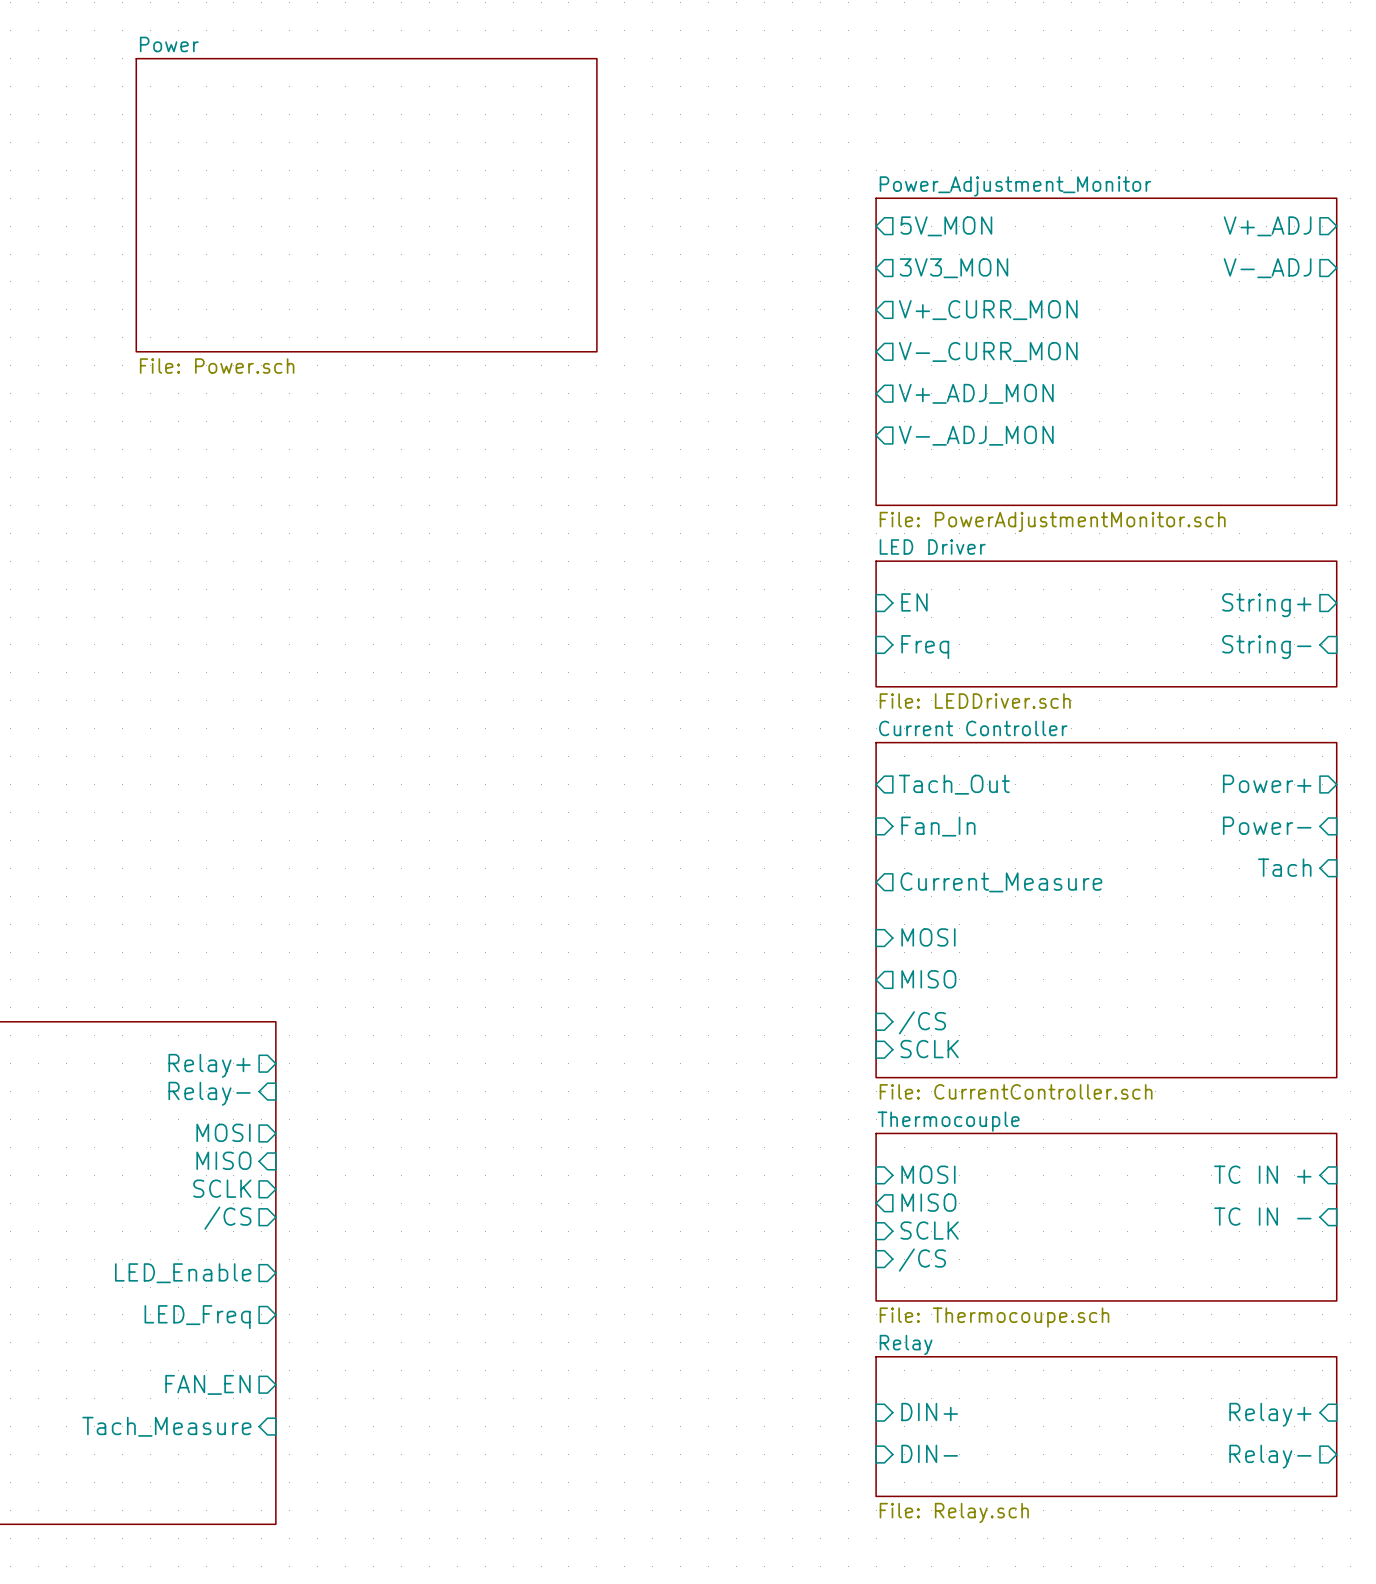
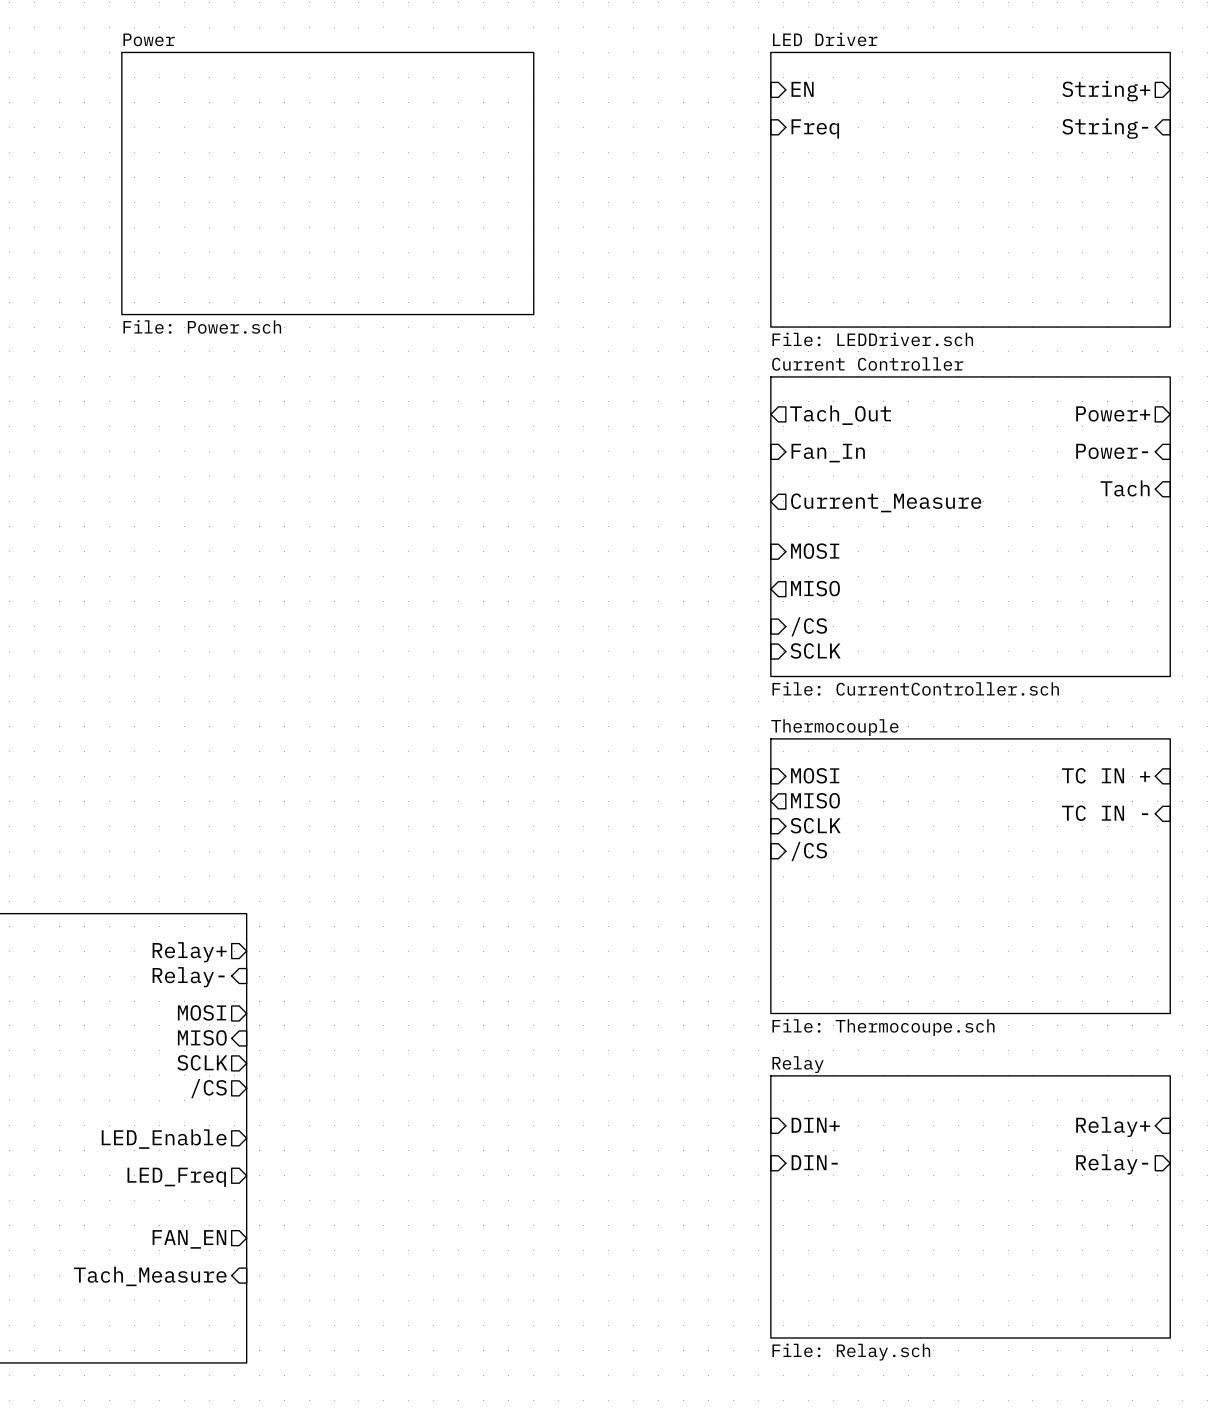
sheet pin: none -> EN (802, 89)
sheet pin: none -> String+ (1106, 91)
sheet pin: none -> Freq (815, 128)
sheet pin: none -> String- (1105, 128)
sheet LED Driver: none -> File: LEDDriver.sch (970, 189)
sheet pin: 5V_MON (946, 226) -> none
sheet pin: V+_ADJ (1267, 226) -> none
sheet pin: 3V3_MON (953, 268) -> none
sheet pin: V-_ADJ (1267, 268) -> none
sheet pin: V+_CURR_MON (988, 310) -> none
sheet pin: V-_CURR_MON (988, 351) -> none
sheet Power_Adjustment_Monitor: File: PowerAdjustmentMonitor.sch (1106, 351) -> none
sheet pin: V+_ADJ_MON (976, 393) -> none
sheet pin: V-_ADJ_MON (976, 435) -> none
sheet pin: none -> Power+ (1113, 413)
sheet pin: none -> Tach_Out (840, 415)
sheet pin: none -> Power- (1112, 451)
sheet pin: none -> Fan_In (828, 453)
sheet pin: none -> Tach (1125, 488)
sheet pin: none -> Current_Measure (886, 502)
sheet Current Controller: none -> File: CurrentController.sch (970, 526)
sheet pin: EN (914, 602) -> none
sheet pin: String+ (1266, 605) -> none
sheet pin: none -> MOSI (815, 551)
sheet LED Driver: File: LEDDriver.sch (1106, 623) -> none
sheet pin: Freq (925, 647) -> none
sheet pin: String- (1266, 647) -> none
sheet pin: none -> MISO (815, 588)
sheet pin: none -> /CS (809, 626)
sheet pin: none -> SCLK (815, 650)
sheet pin: Power+ (1267, 783) -> none
sheet pin: Tach_Out (954, 784) -> none
sheet pin: Power- (1267, 825) -> none
sheet pin: Fan_In (938, 826) -> none
sheet pin: none -> TC IN + (1106, 775)
sheet pin: Tach (1284, 867) -> none
sheet pin: Current_Measure (1001, 882) -> none
sheet pin: none -> TC IN - (1105, 813)
sheet Current Controller: File: CurrentController.sch (1106, 910) -> none
sheet pin position: MOSI (928, 937) -> MOSI (815, 775)
sheet pin position: MISO (928, 979) -> MISO (815, 800)
sheet Thermocouple: none -> File: Thermocoupe.sch (970, 876)
sheet pin position: /CS (922, 1022) -> /CS (809, 851)
sheet pin position: SCLK (929, 1049) -> SCLK (815, 825)
sheet pin: MOSI (928, 1174) -> none
sheet pin: TC IN + (1262, 1174) -> none
sheet pin: MISO (928, 1202) -> none
sheet pin: TC IN - (1262, 1216) -> none
sheet Thermocouple: File: Thermocoupe.sch (1106, 1217) -> none
sheet pin: SCLK (929, 1230) -> none
sheet pin: /CS (922, 1260) -> none
sheet Relay: none -> File: Relay.sch (970, 1206)
sheet pin position: DIN+ (929, 1412) -> DIN+ (815, 1125)
sheet pin position: Relay+ (1270, 1414) -> Relay+ (1113, 1126)
sheet Relay: File: Relay.sch (1106, 1426) -> none
sheet pin position: DIN- (929, 1453) -> DIN- (814, 1162)
sheet pin position: Relay- (1270, 1456) -> Relay- (1112, 1164)

